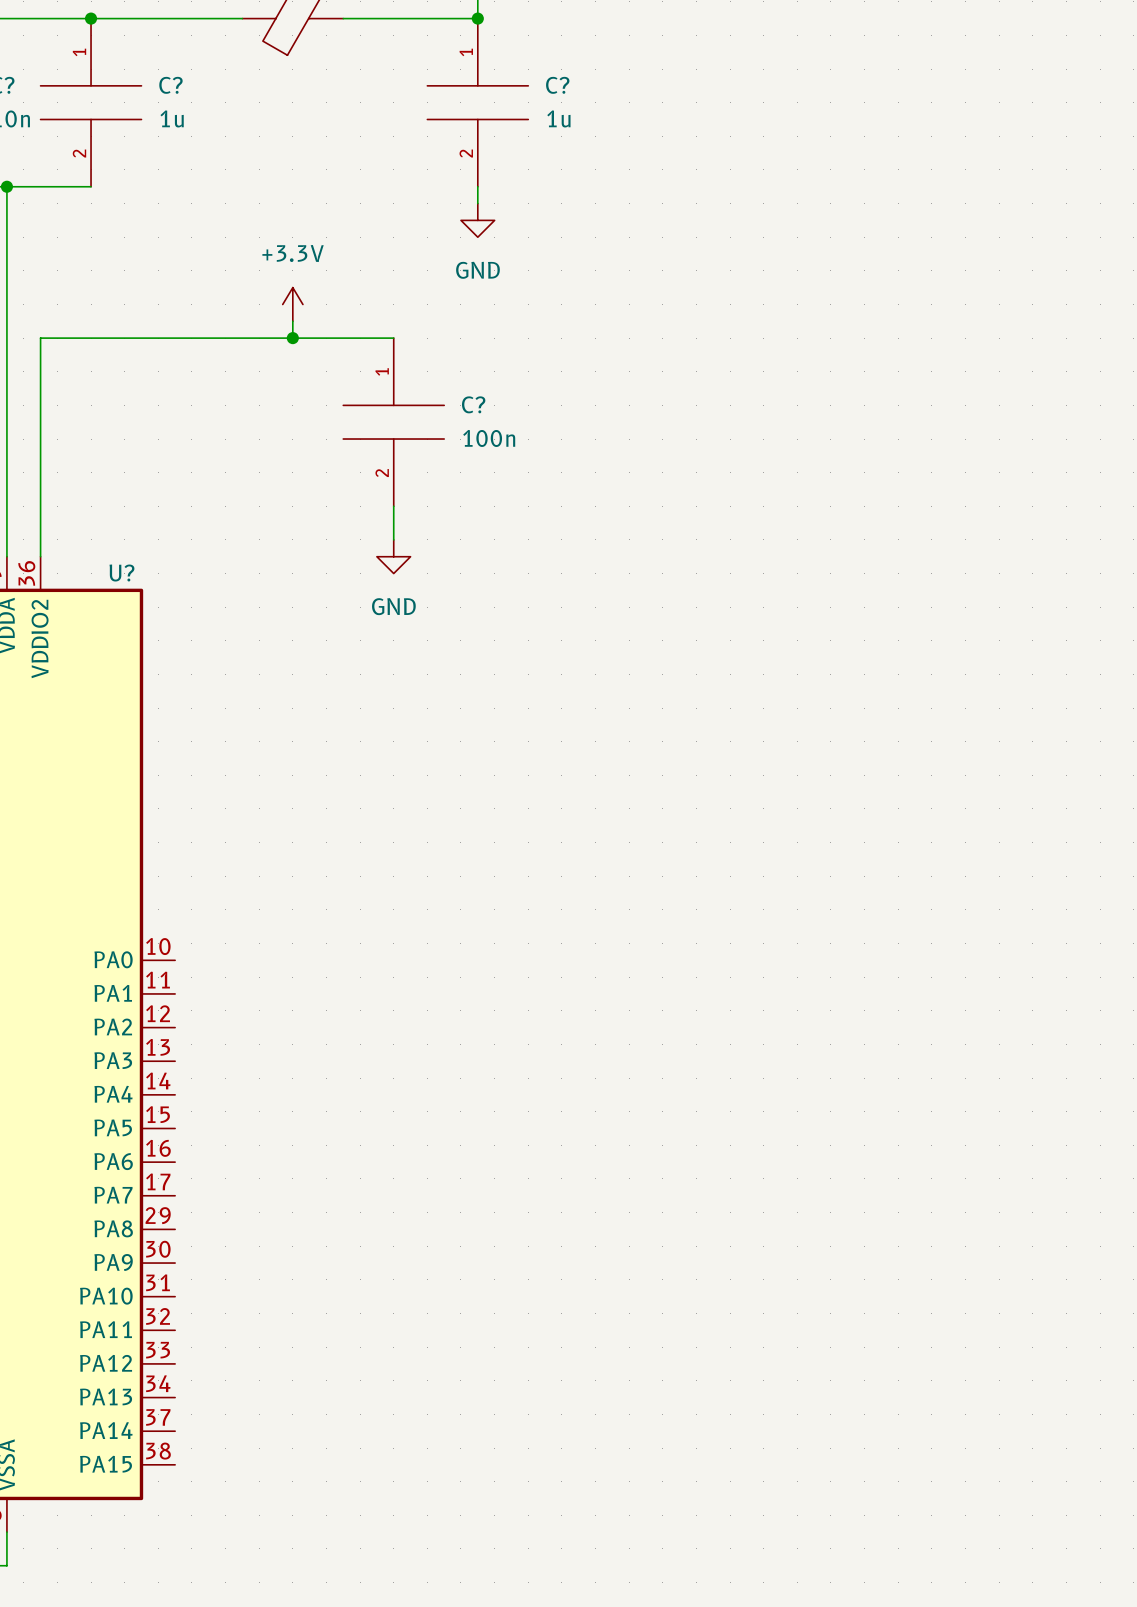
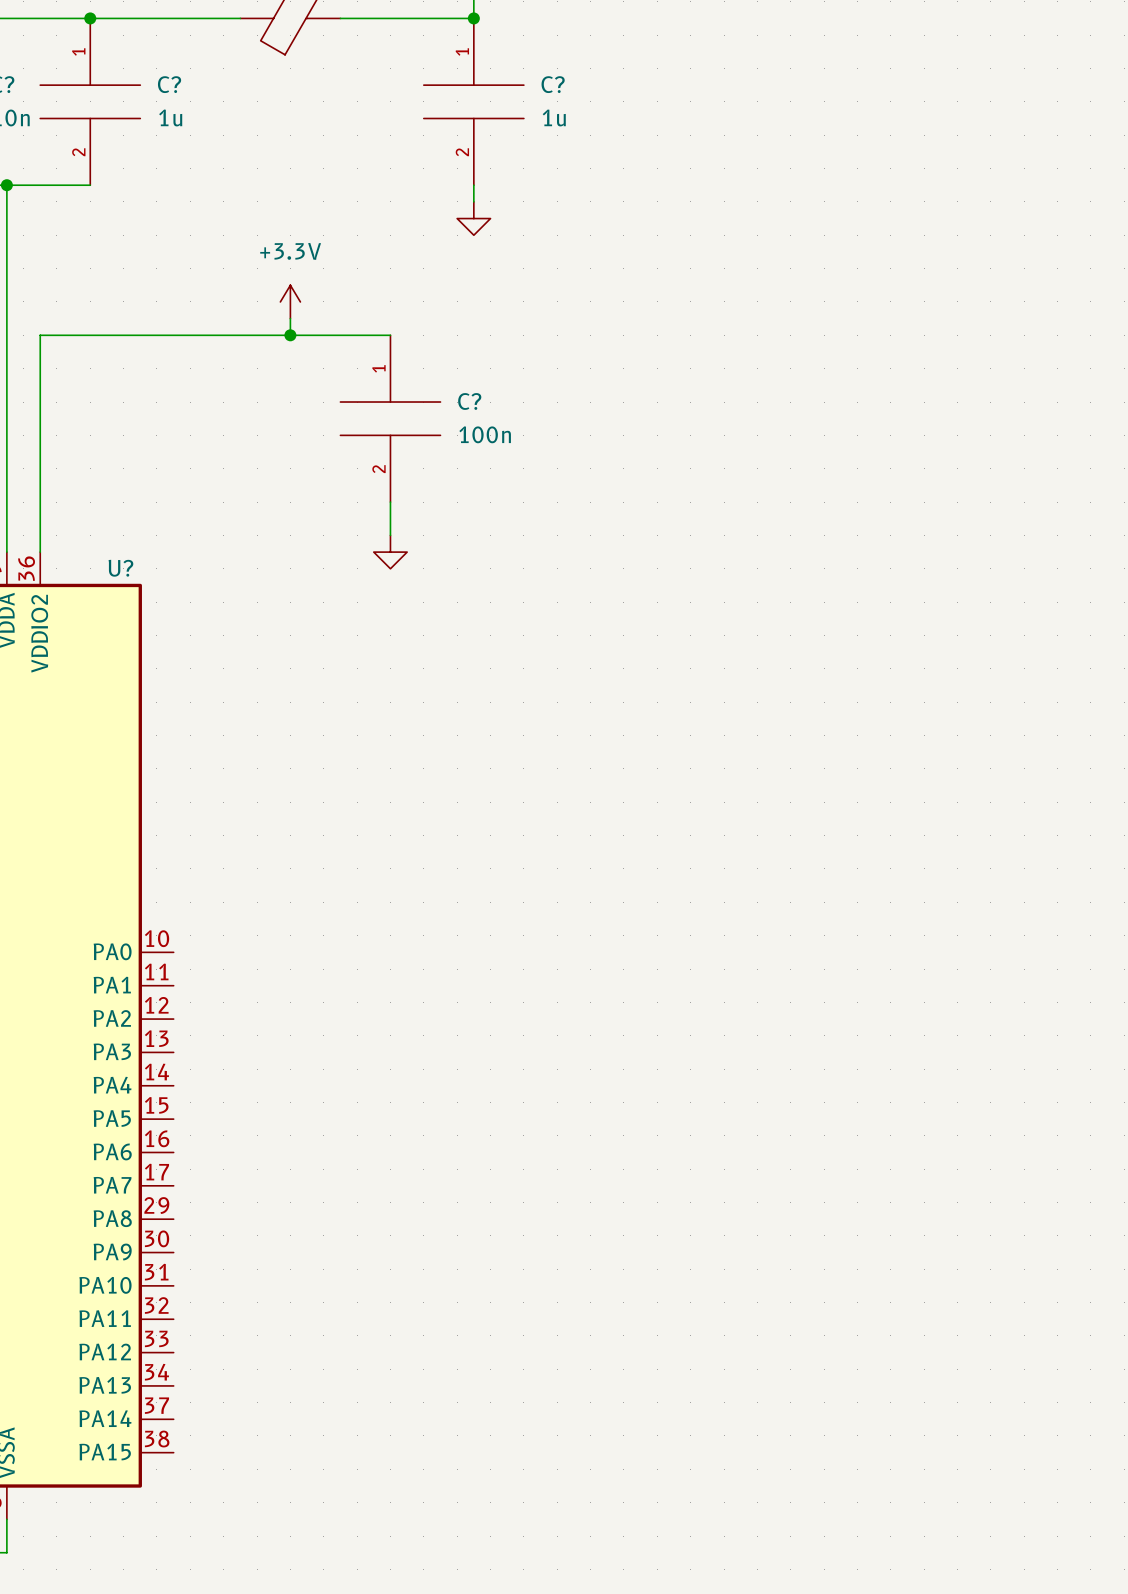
power symbol text: GND (477, 270) -> none
power symbol text: GND (393, 606) -> none

